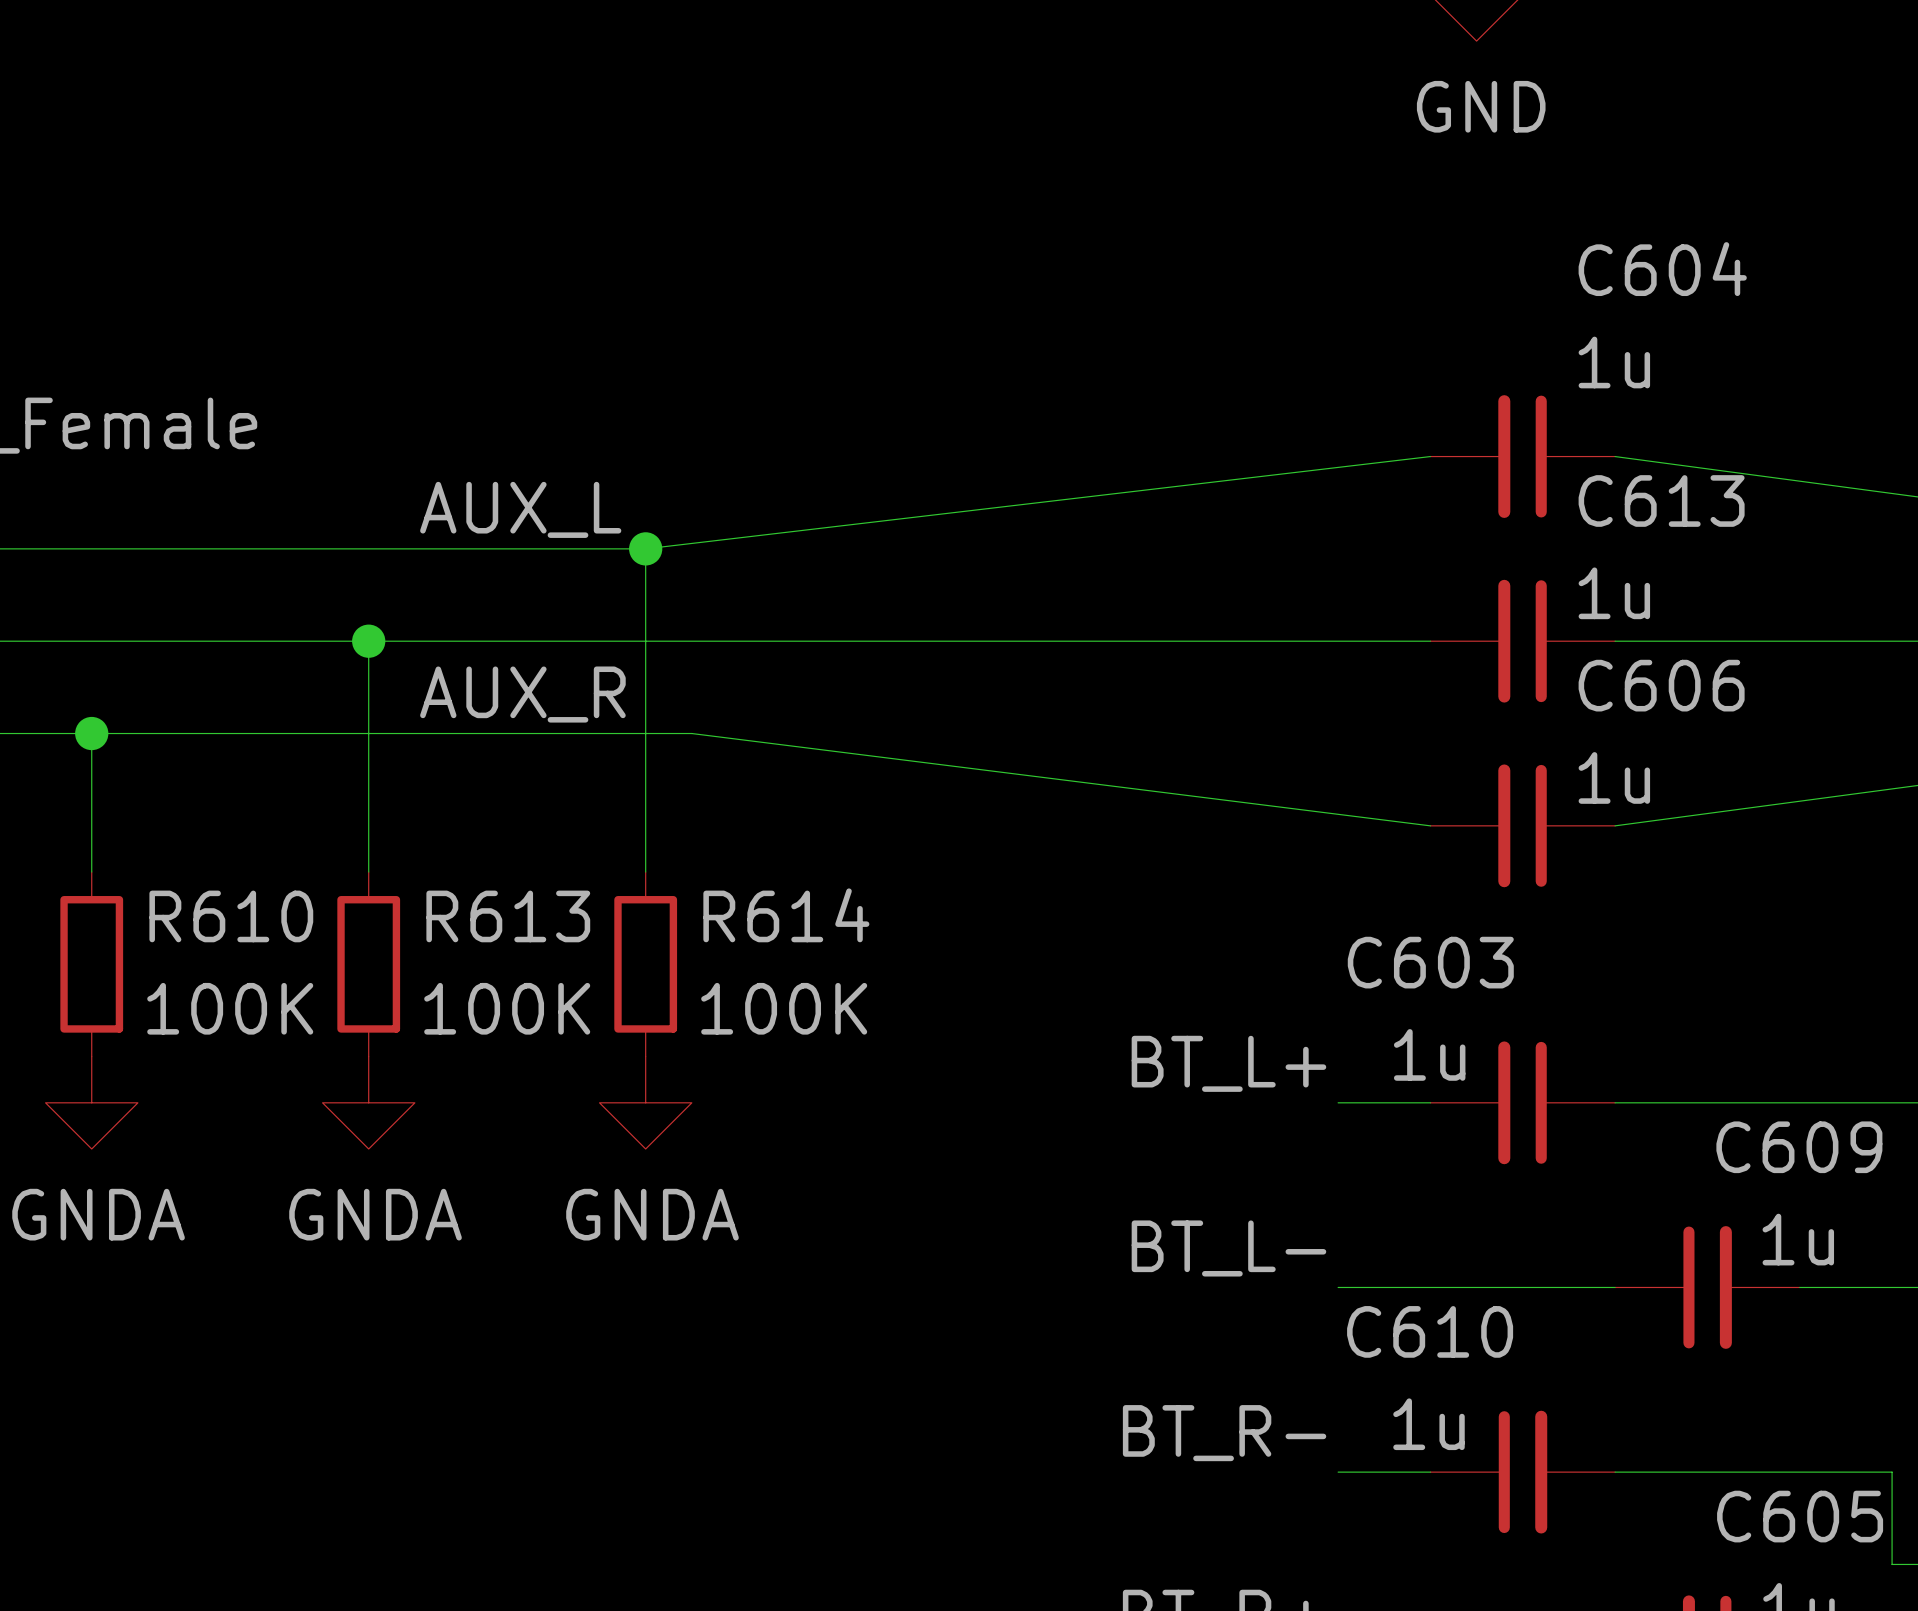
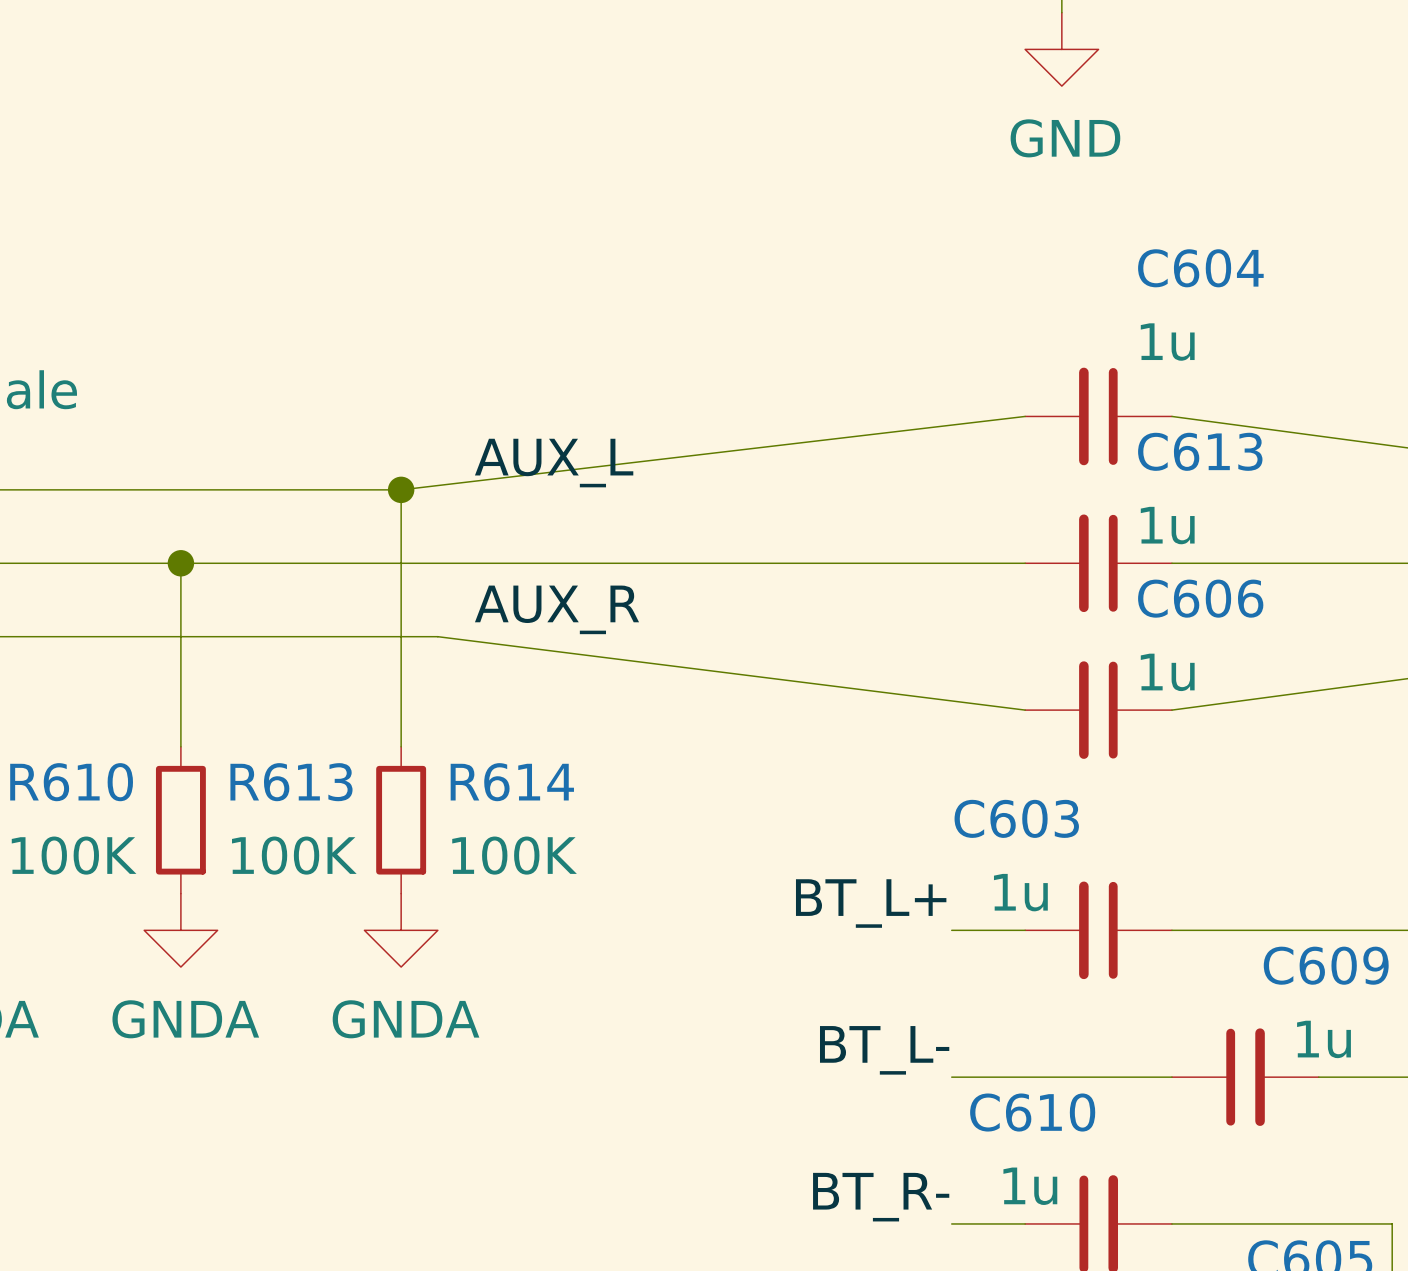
label position: AUX_L (520, 509) -> AUX_L (554, 463)
label position: AUX_R (522, 694) -> AUX_R (557, 609)

